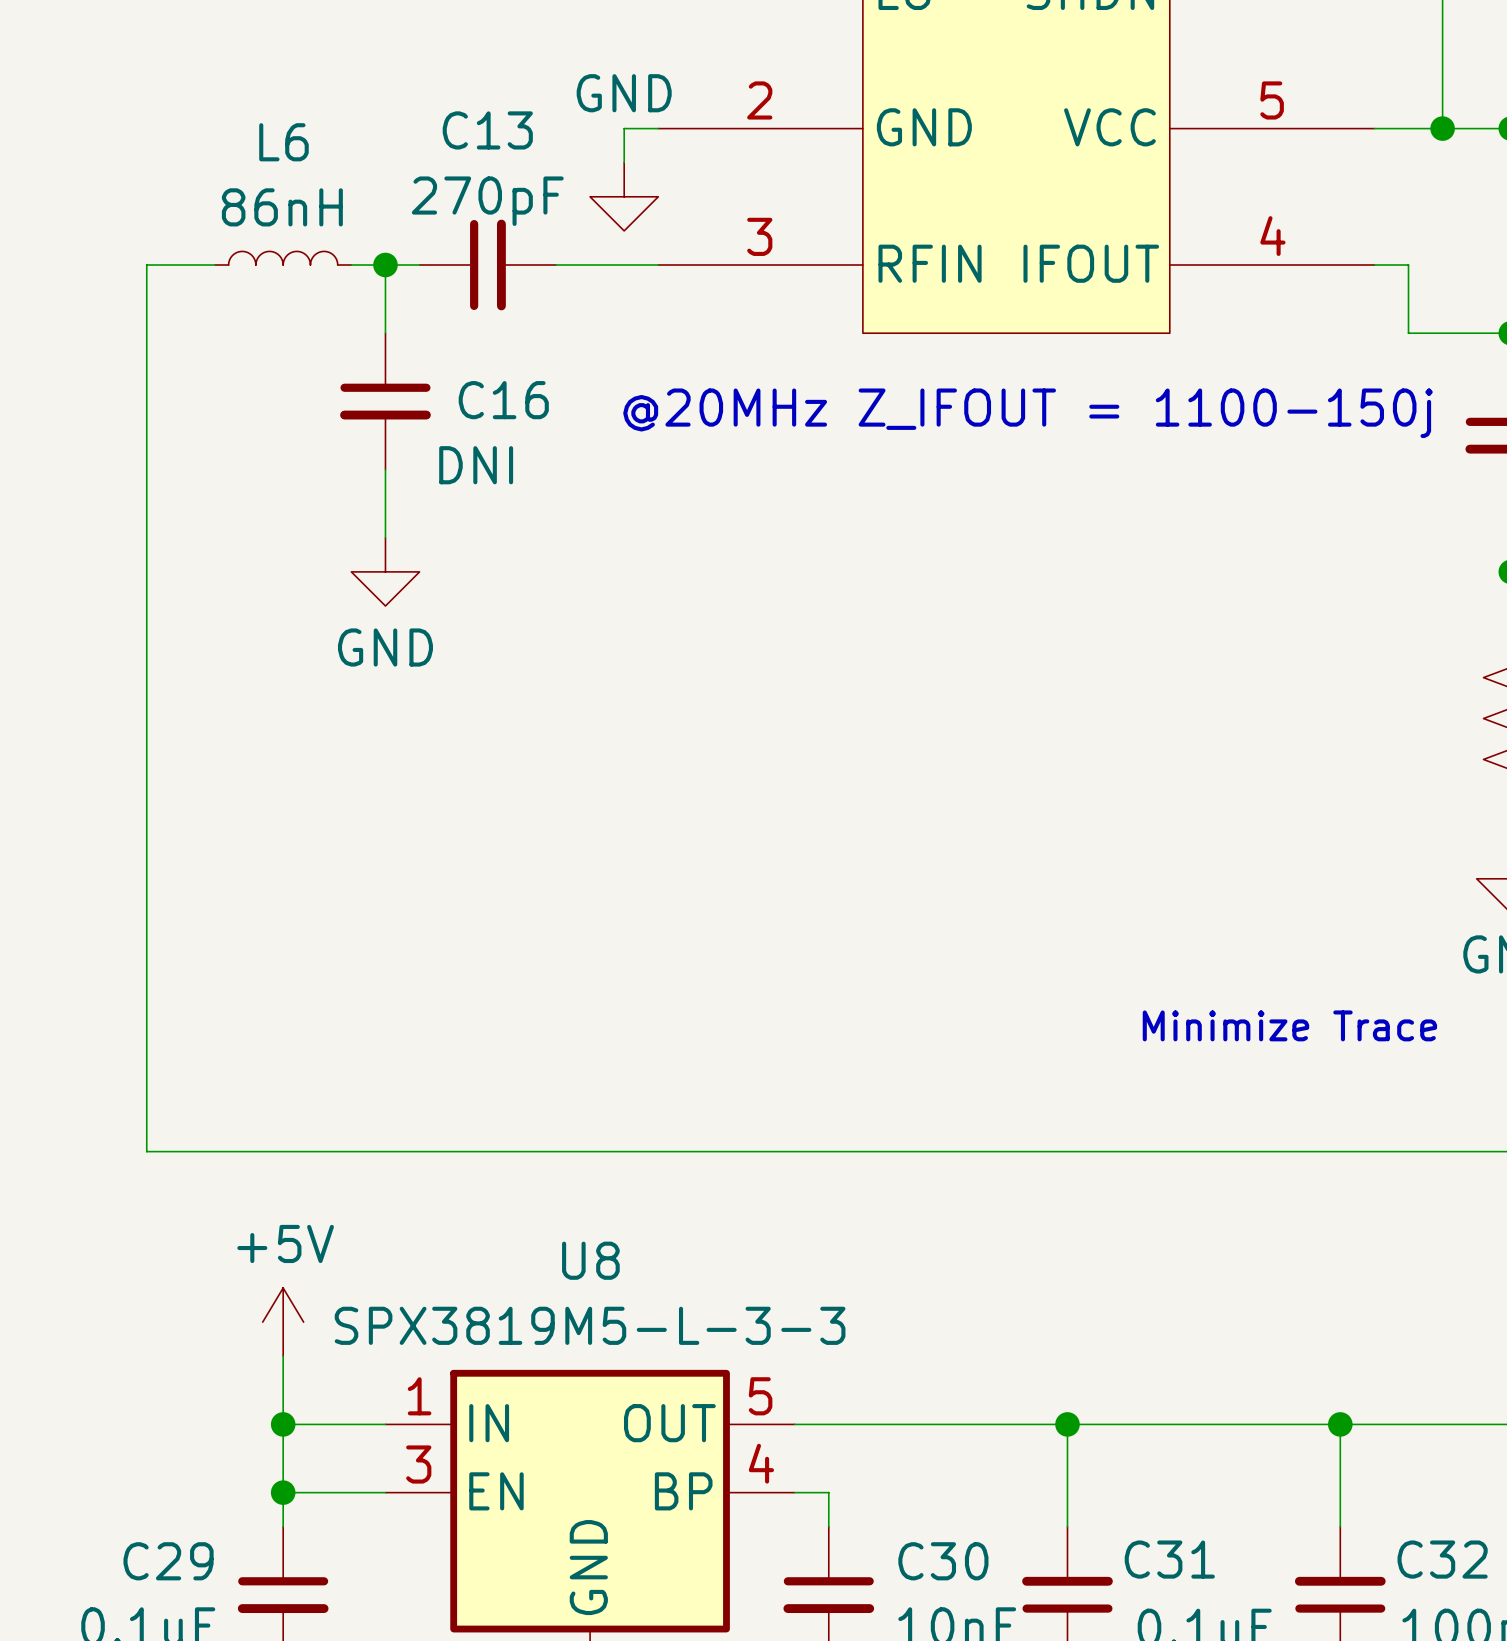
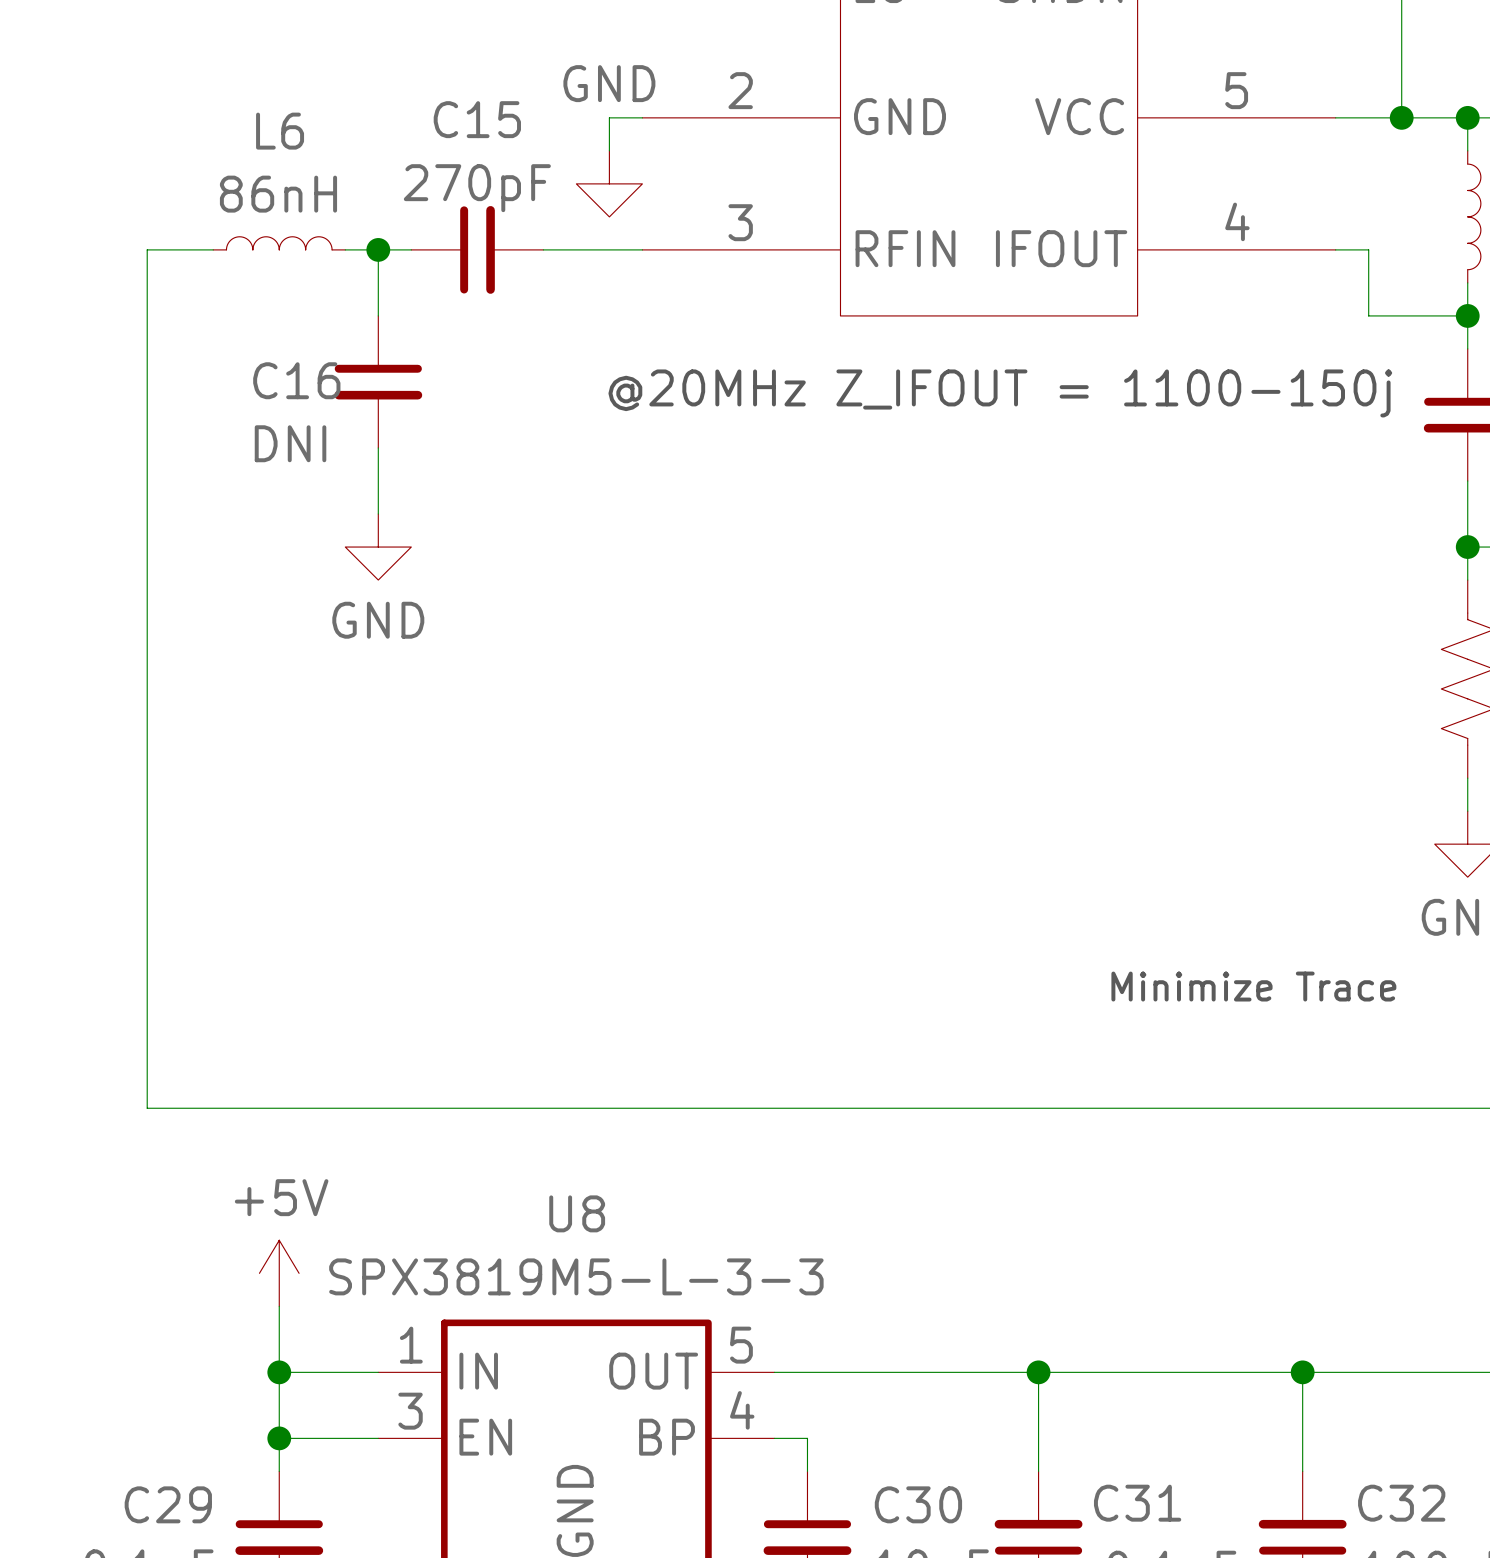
C13 name: C13 (487, 130) -> C15 (477, 119)
C16 name position: C16 (503, 400) -> C16 (296, 380)
C16 value position: DNI (476, 465) -> DNI (290, 443)

